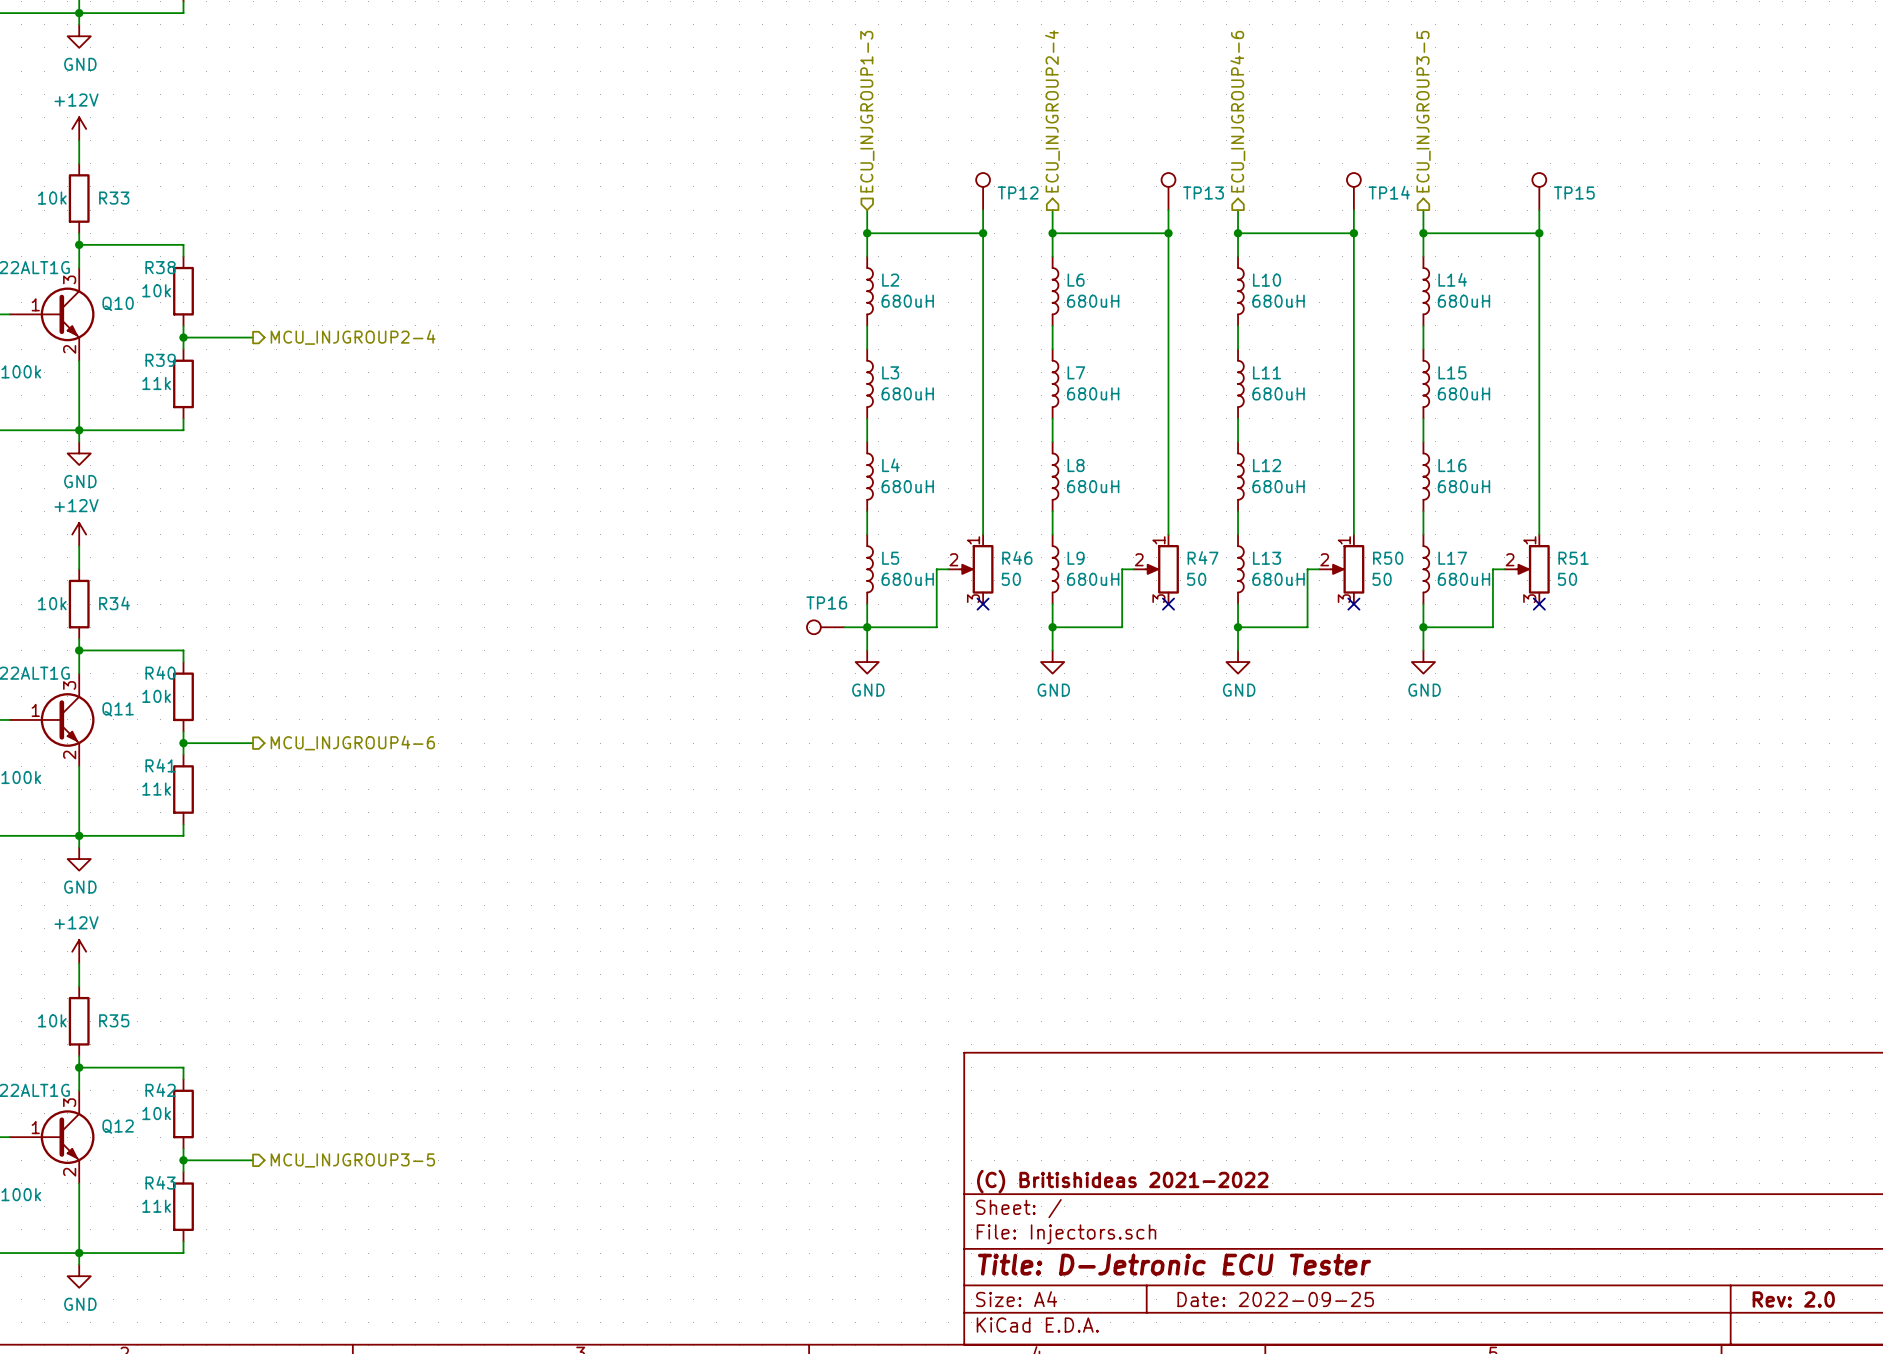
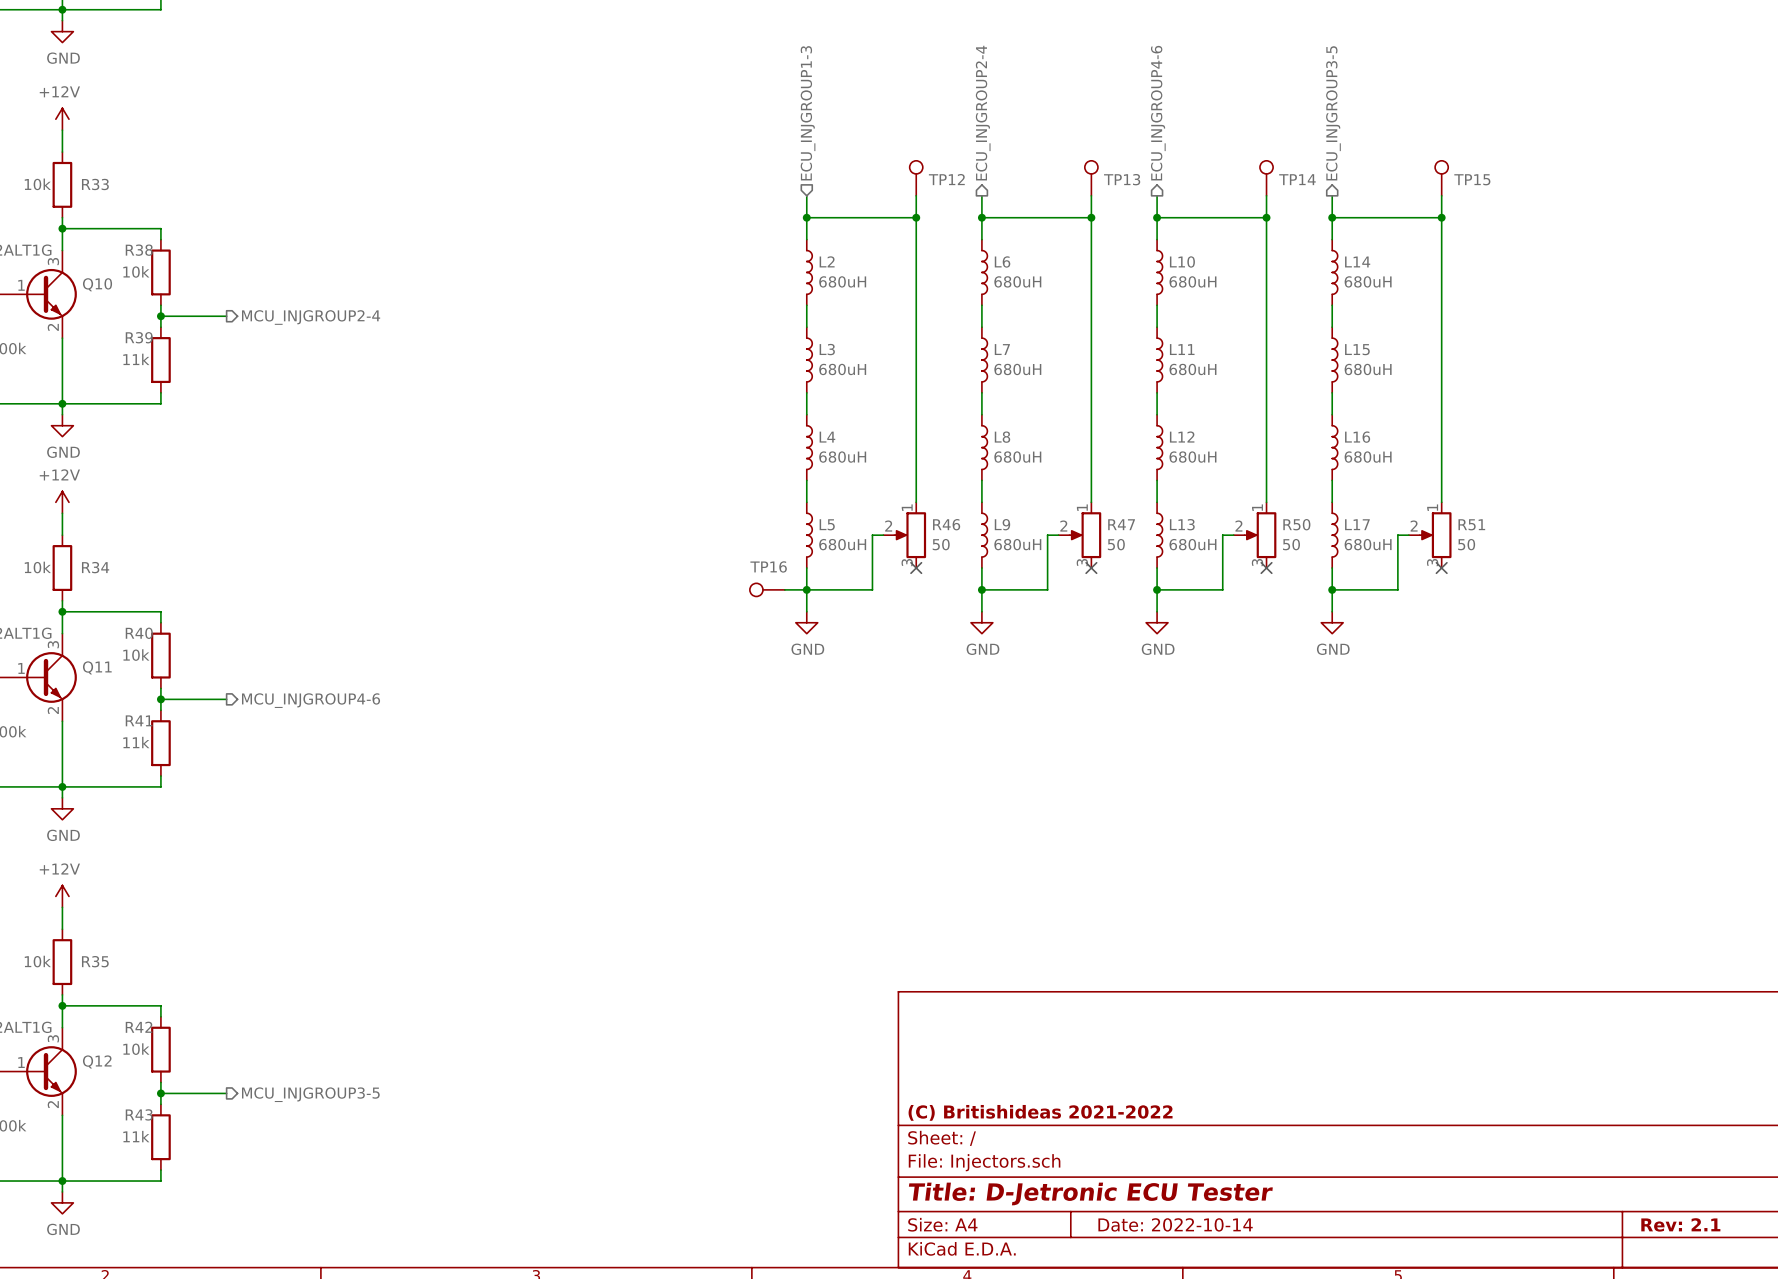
title block: Date: 2022-09-25 (1275, 1299) -> Date: 2022-10-14 (1175, 1224)
title block: Rev: 2.0 (1793, 1299) -> Rev: 2.1 (1680, 1224)

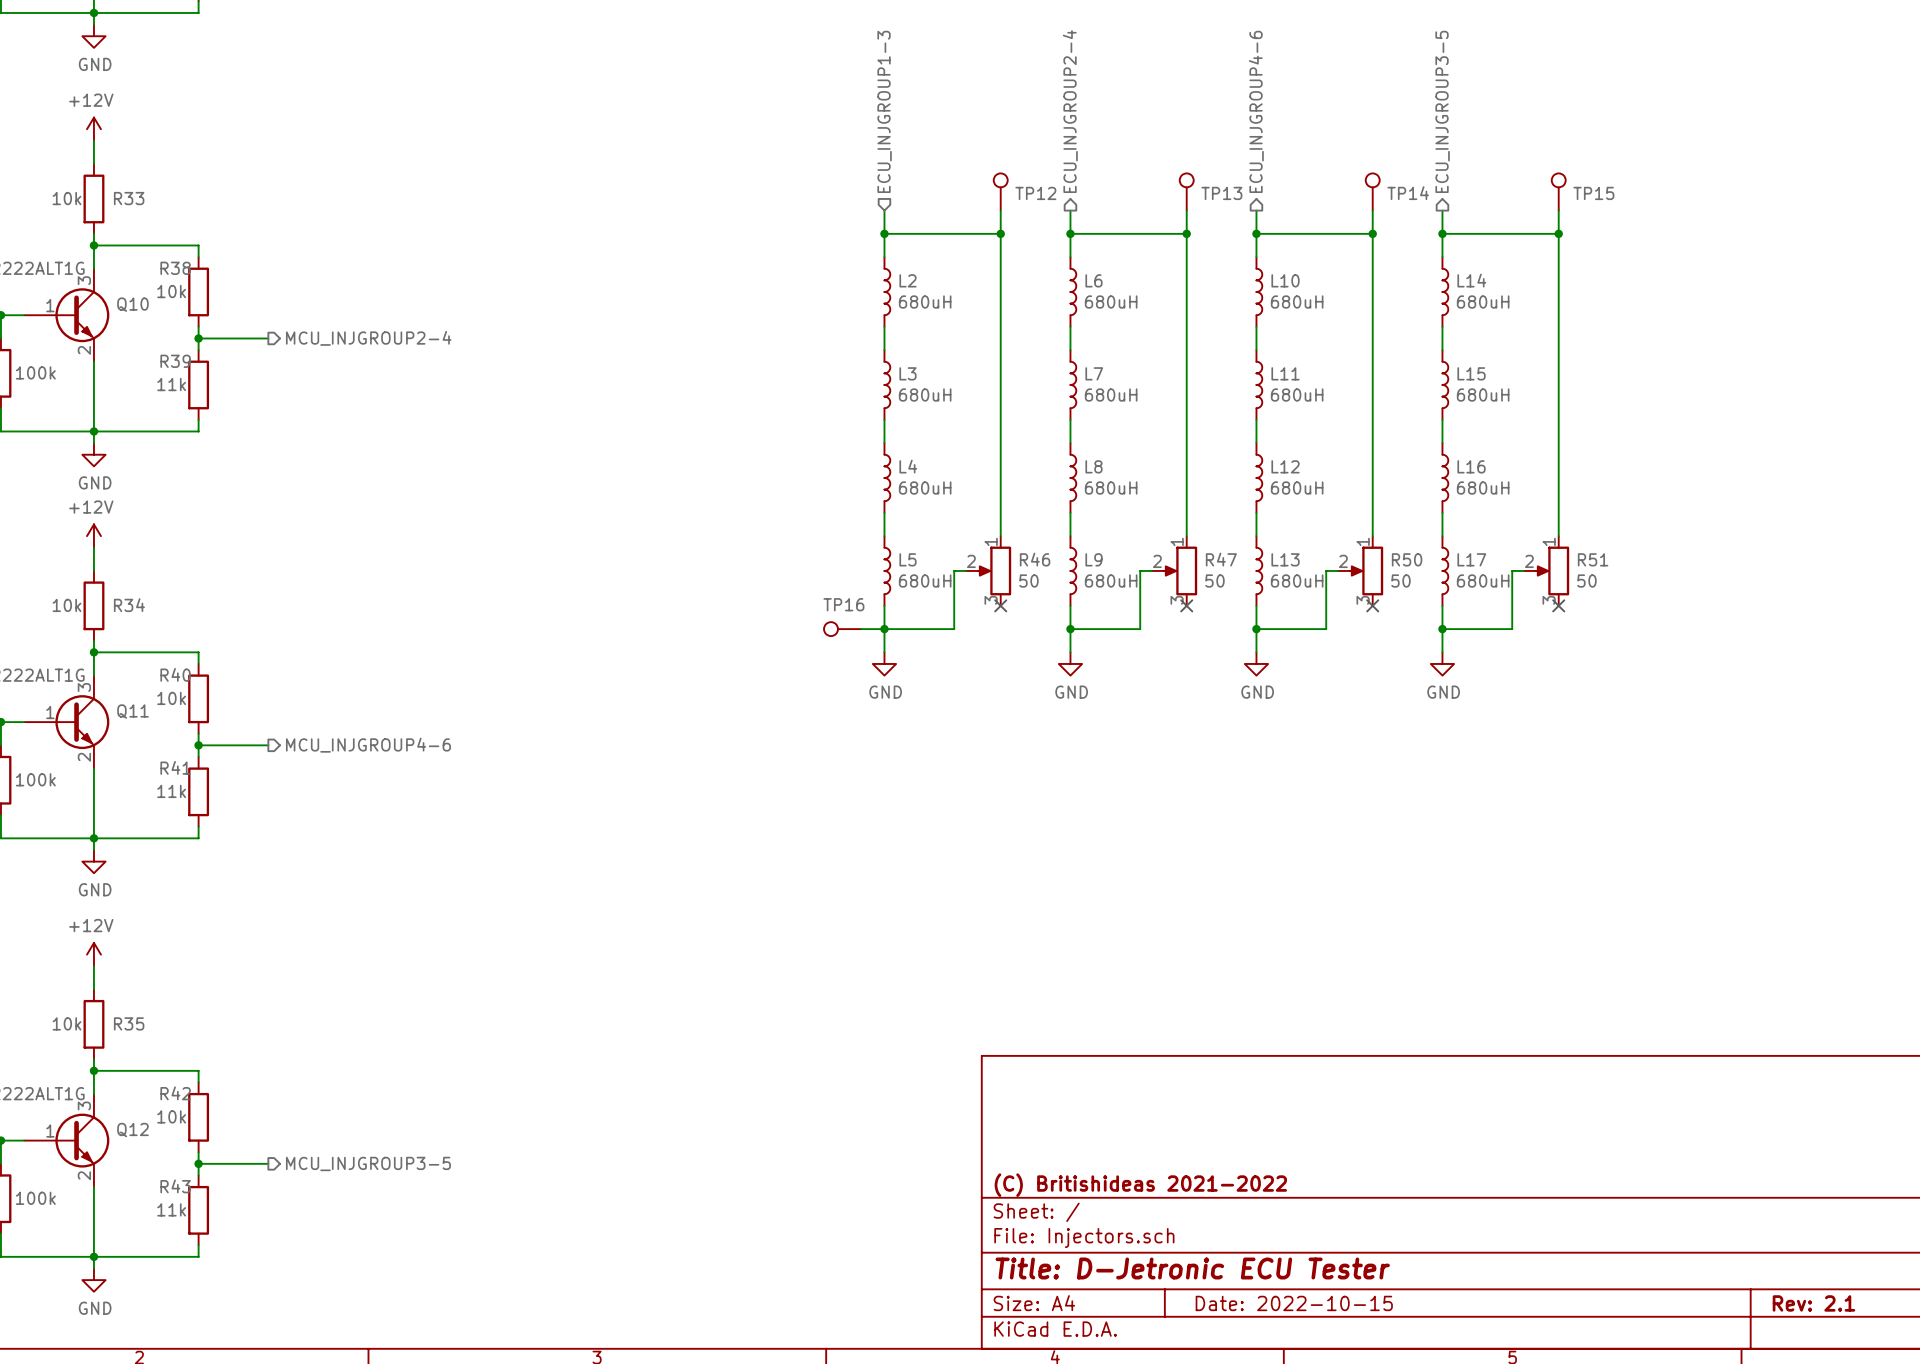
title block: Date: 2022-10-14 (1175, 1224) -> Date: 2022-10-15 (1294, 1303)

